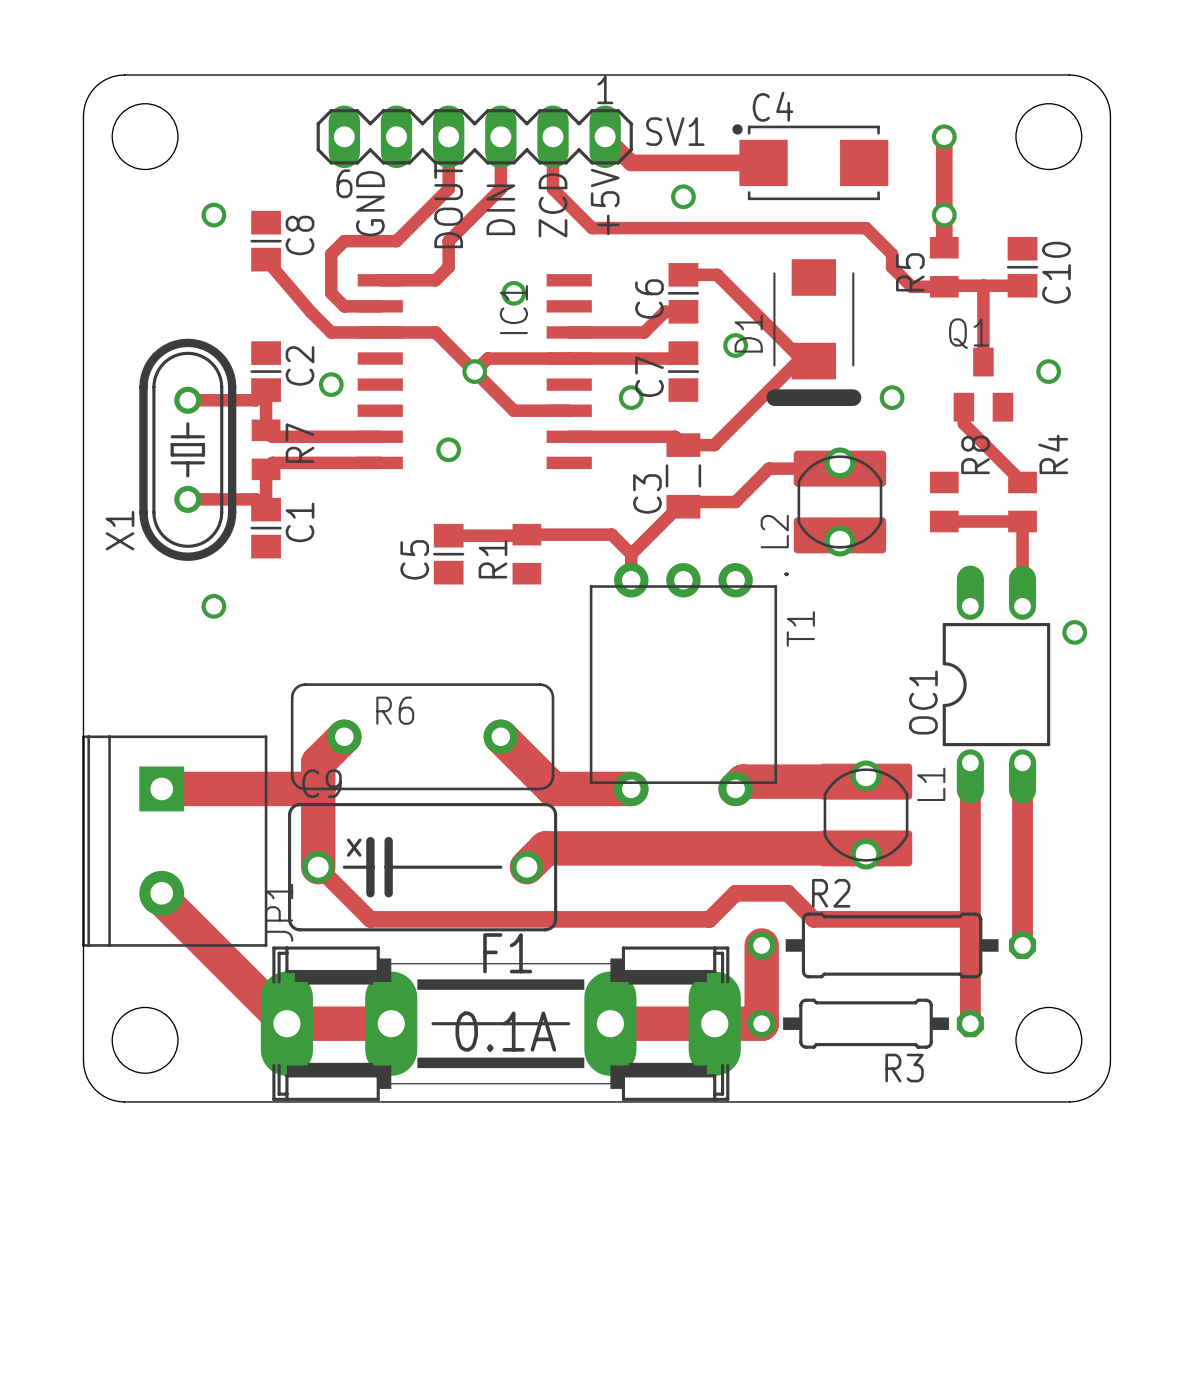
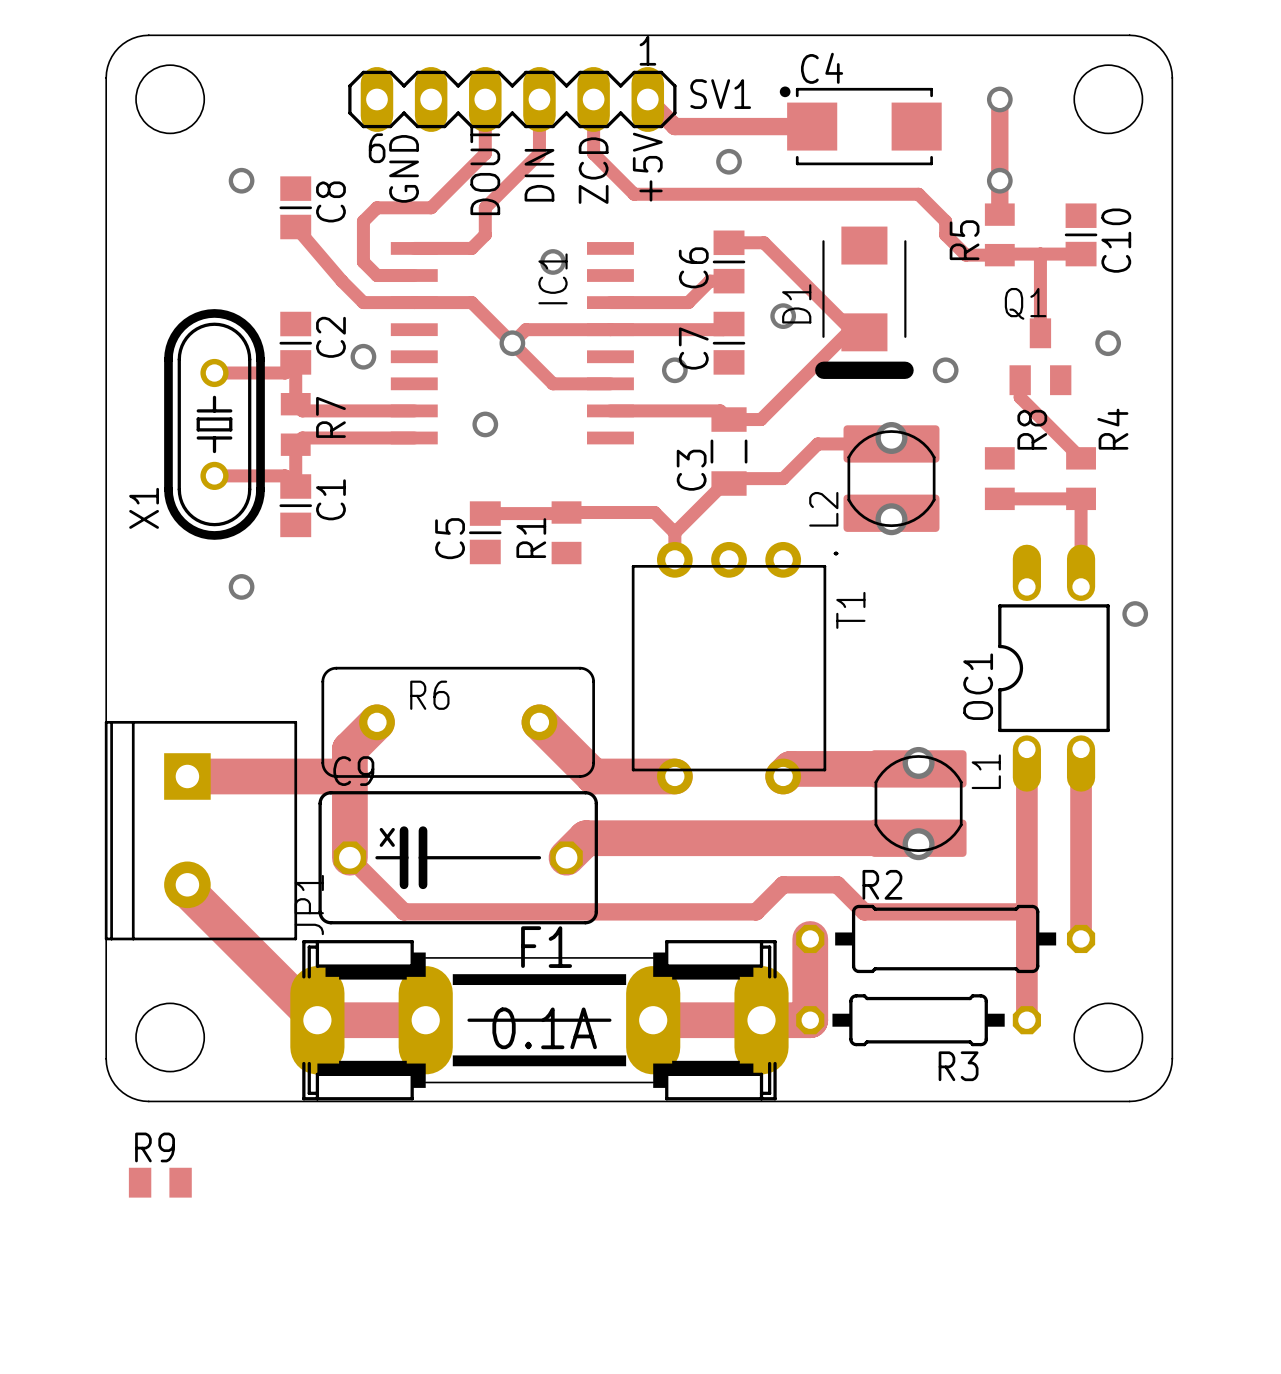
R9: none -> (160, 1182)

